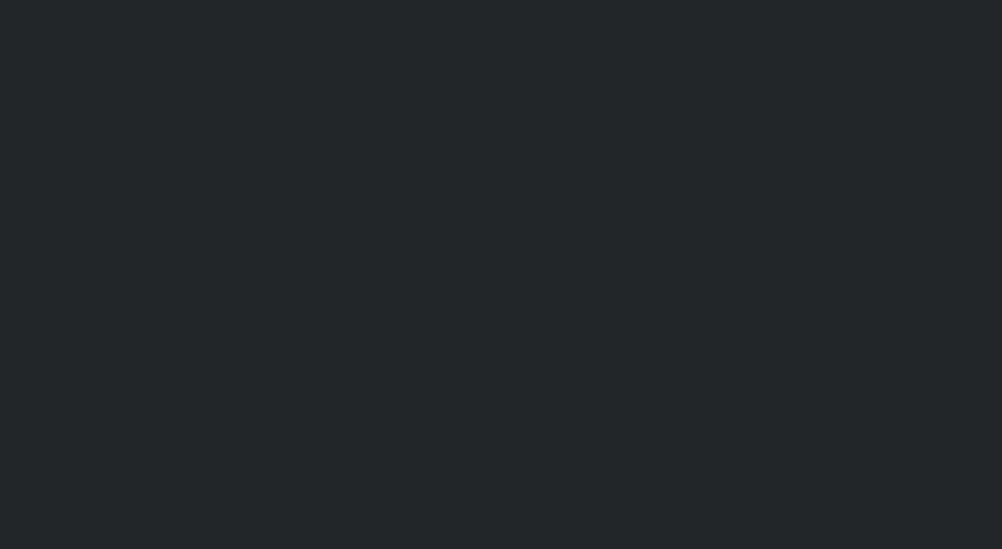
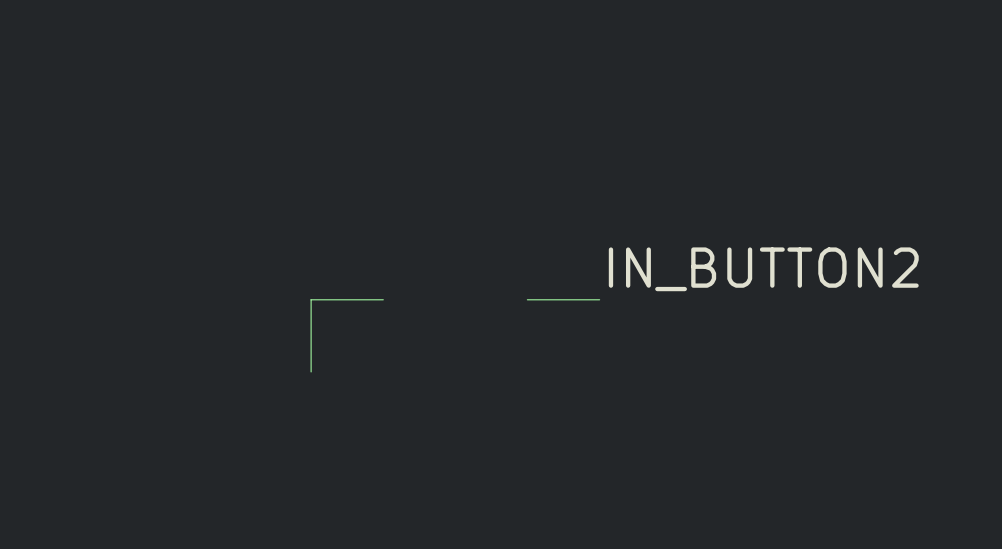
label: none -> IN_BUTTON2 (763, 269)
wire: none -> (383, 299) (311, 299) (311, 371)
wire: none -> (527, 299) (599, 299)

